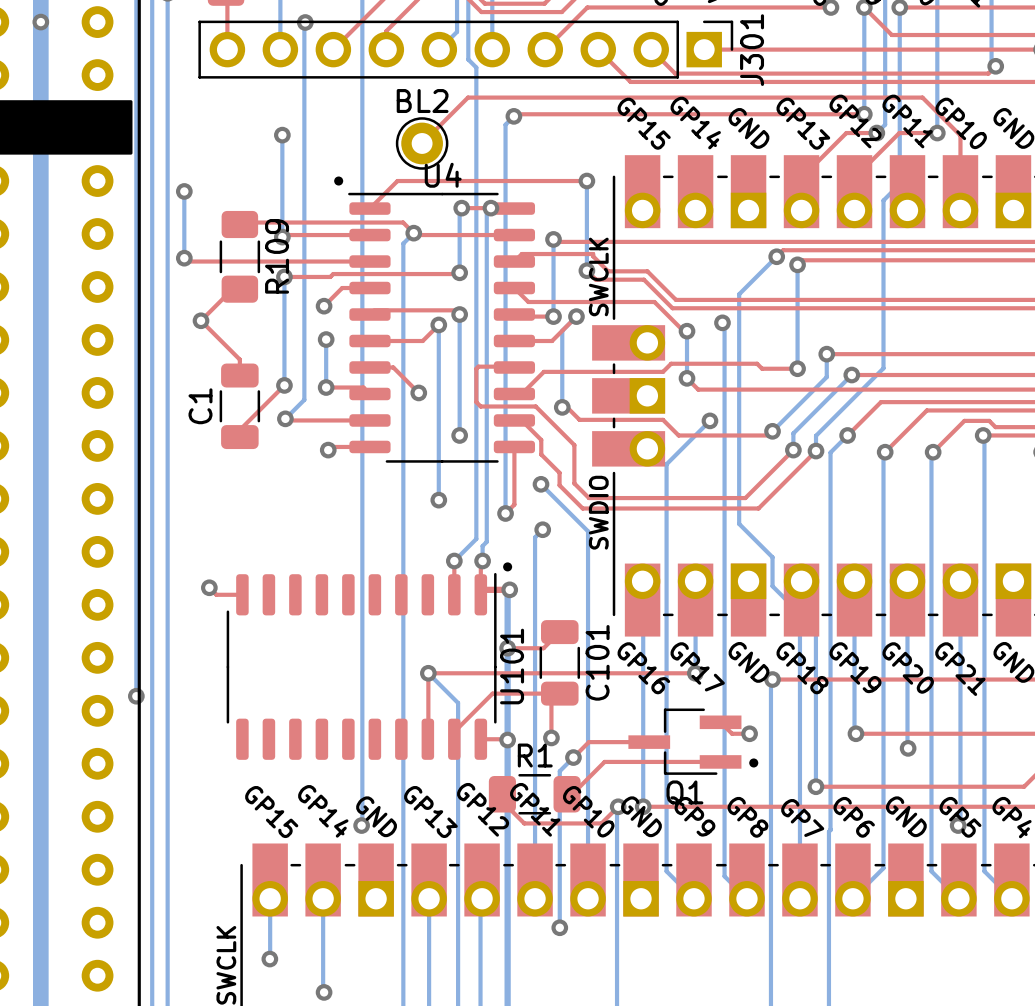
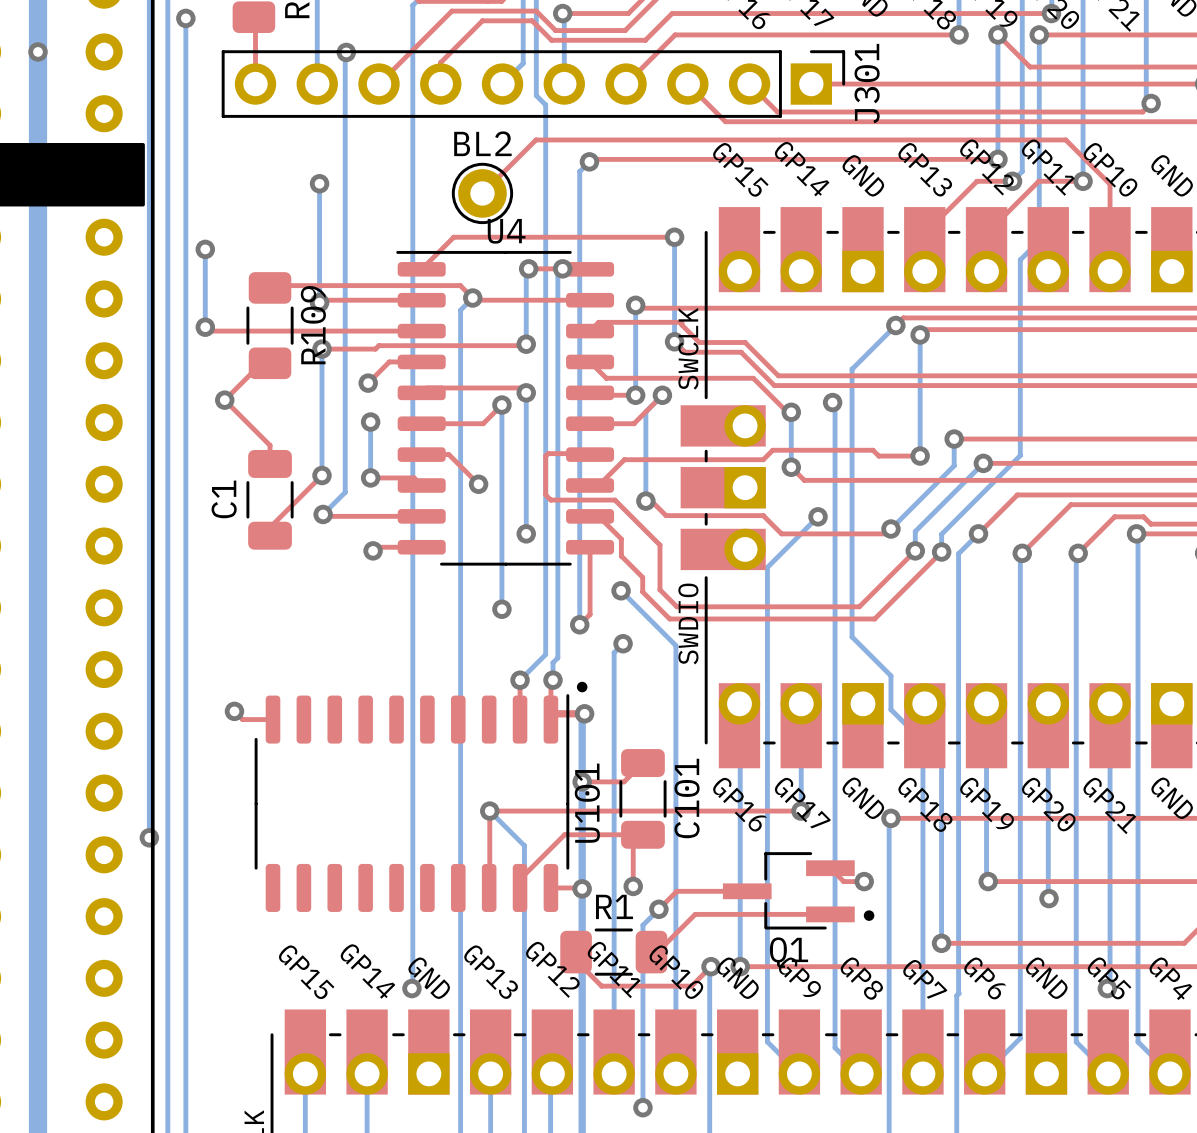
drawing: [334, 176, 344, 186] -> none

